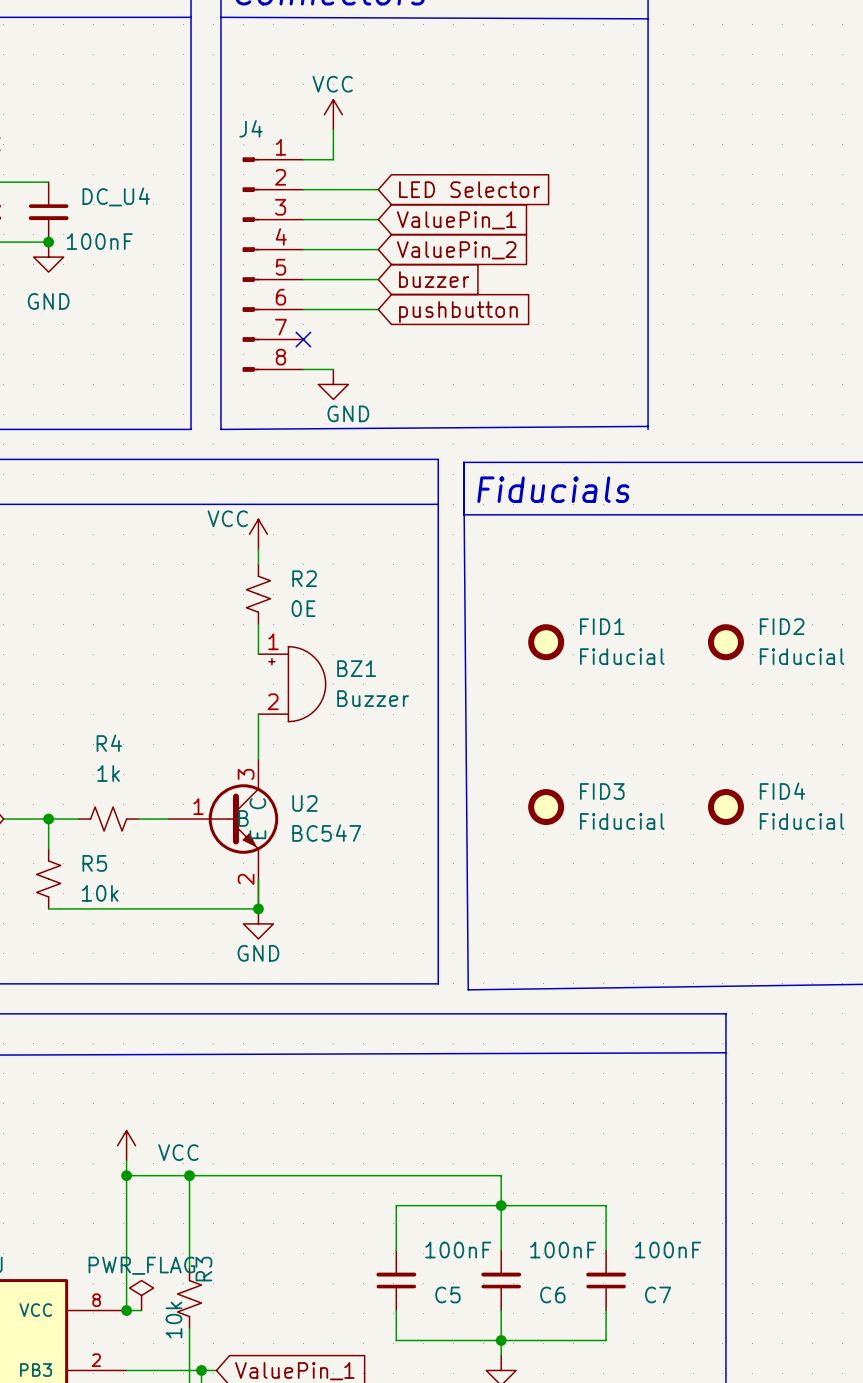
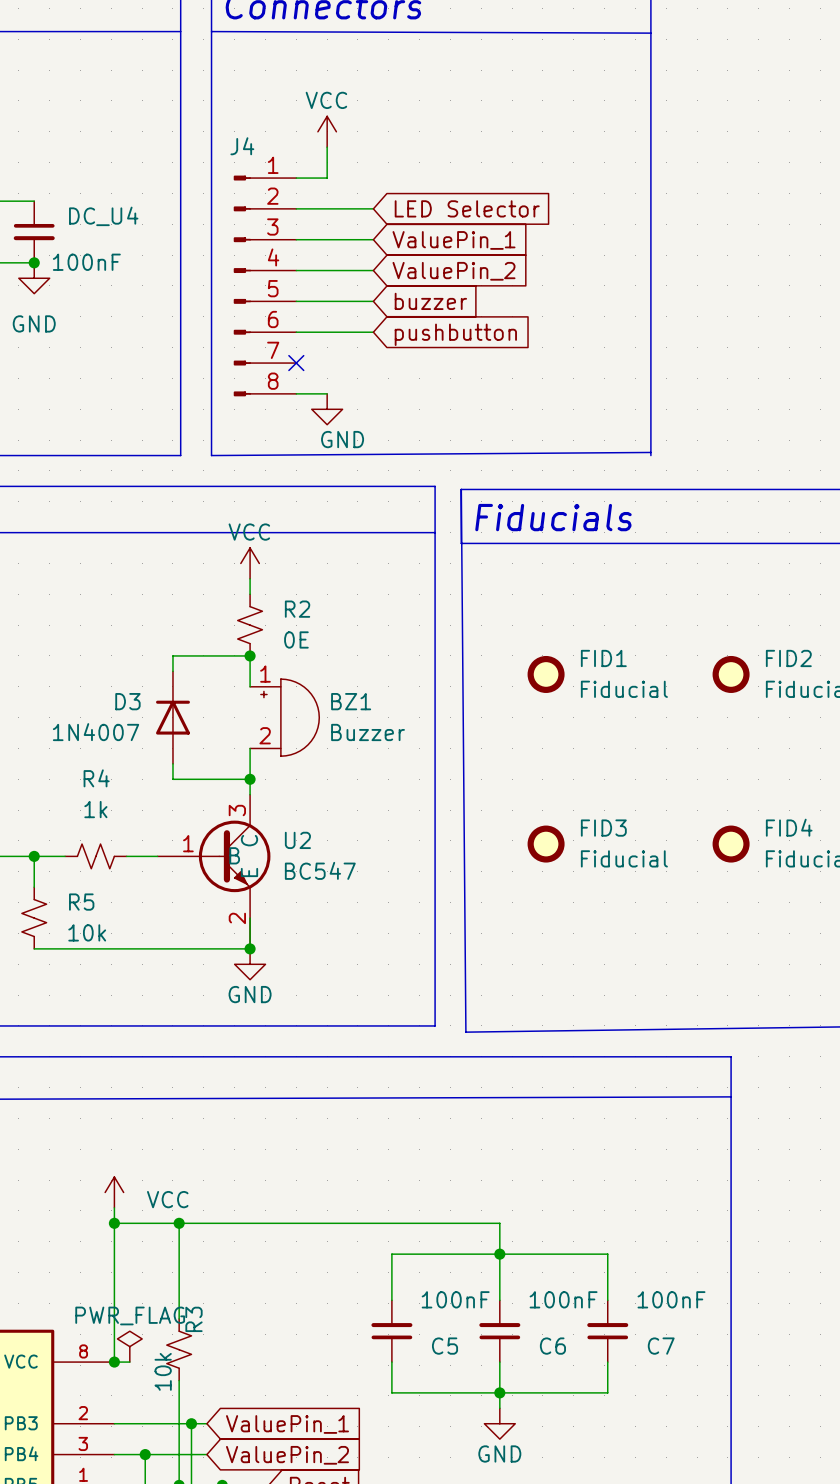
power symbol text position: VCC (227, 518) -> VCC (249, 532)
wire: none -> (250, 655) (172, 655) (172, 671)
junction: none -> (250, 655)
D3: none -> 1N4007 (172, 717)
wire: none -> (172, 763) (172, 779) (250, 779)
junction: none -> (250, 779)

